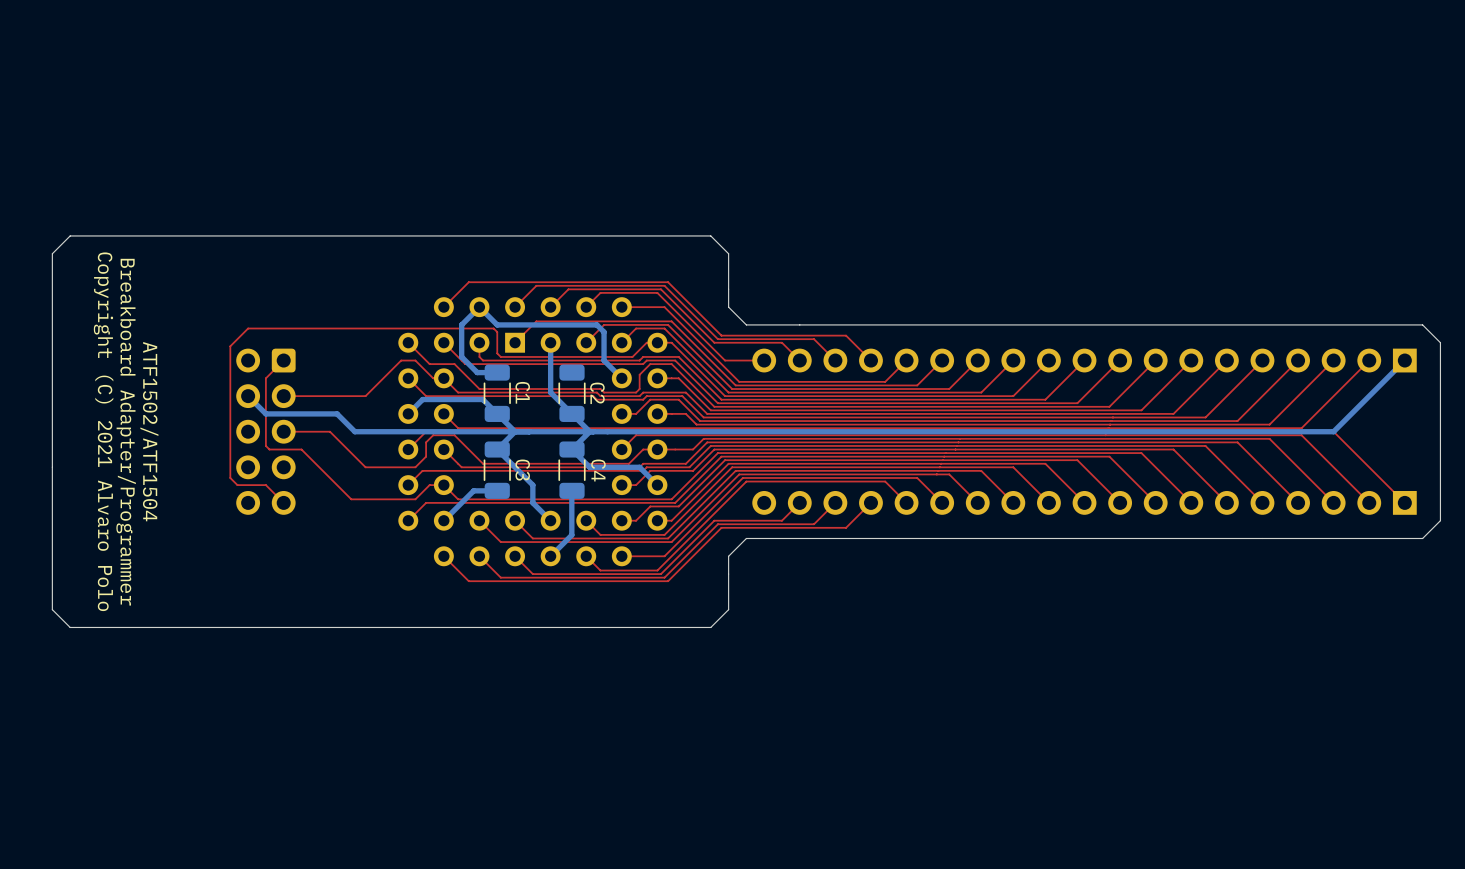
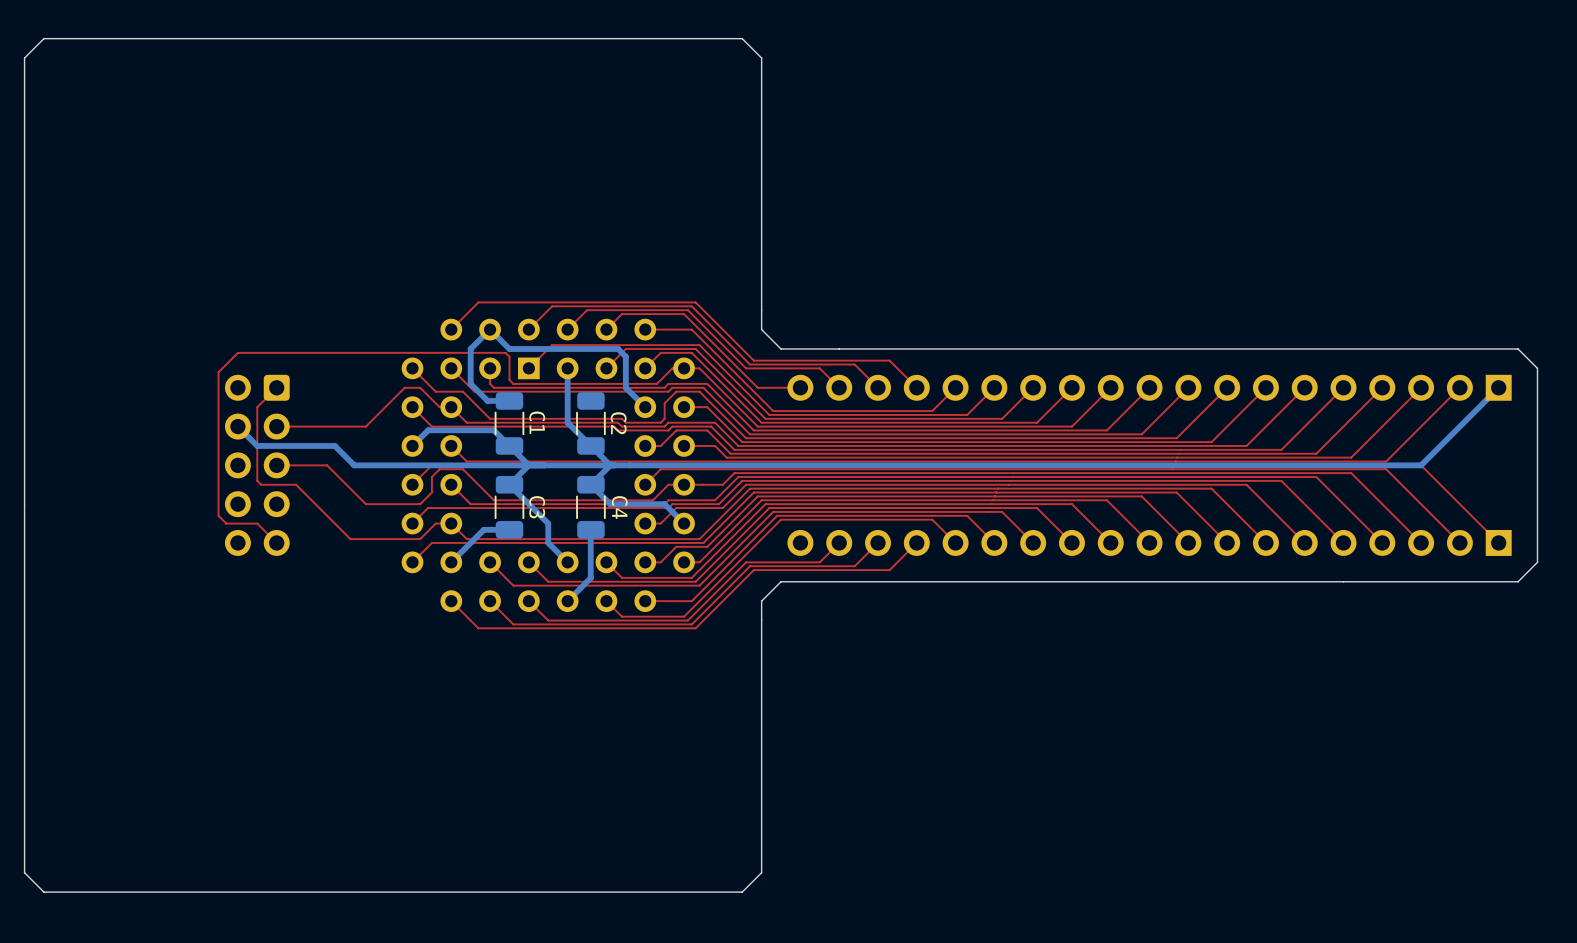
board edge: (728, 253) (710, 235) (70, 235) (52, 253) -> (761, 271) (761, 58) (742, 38) (43, 38) (24, 58) (24, 271)
text: Copyright (C) 2021 Alvaro Polo (103, 431) -> none
text: ATF1502/ATF1504 (149, 431) -> none
text: Breakboard Adapter/Programmer (126, 432) -> none
board edge: (728, 609) (710, 627) (70, 627) (52, 609) -> (761, 659) (761, 872) (742, 892) (43, 892) (24, 872) (24, 659)

